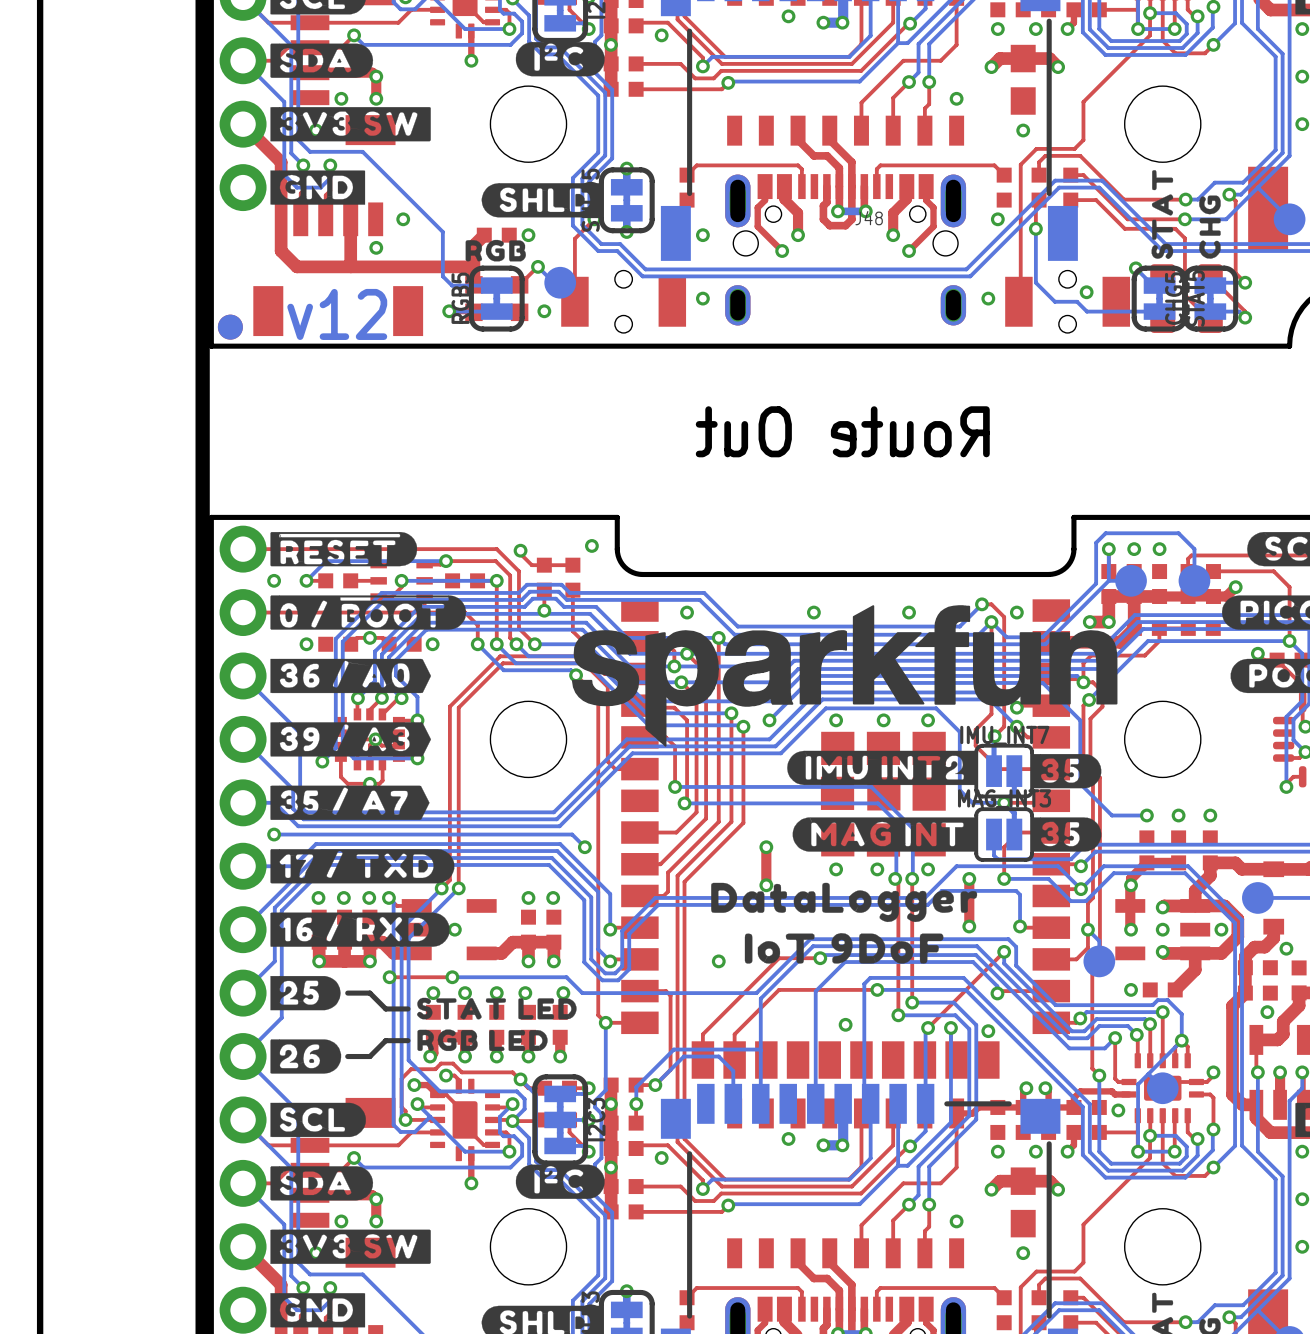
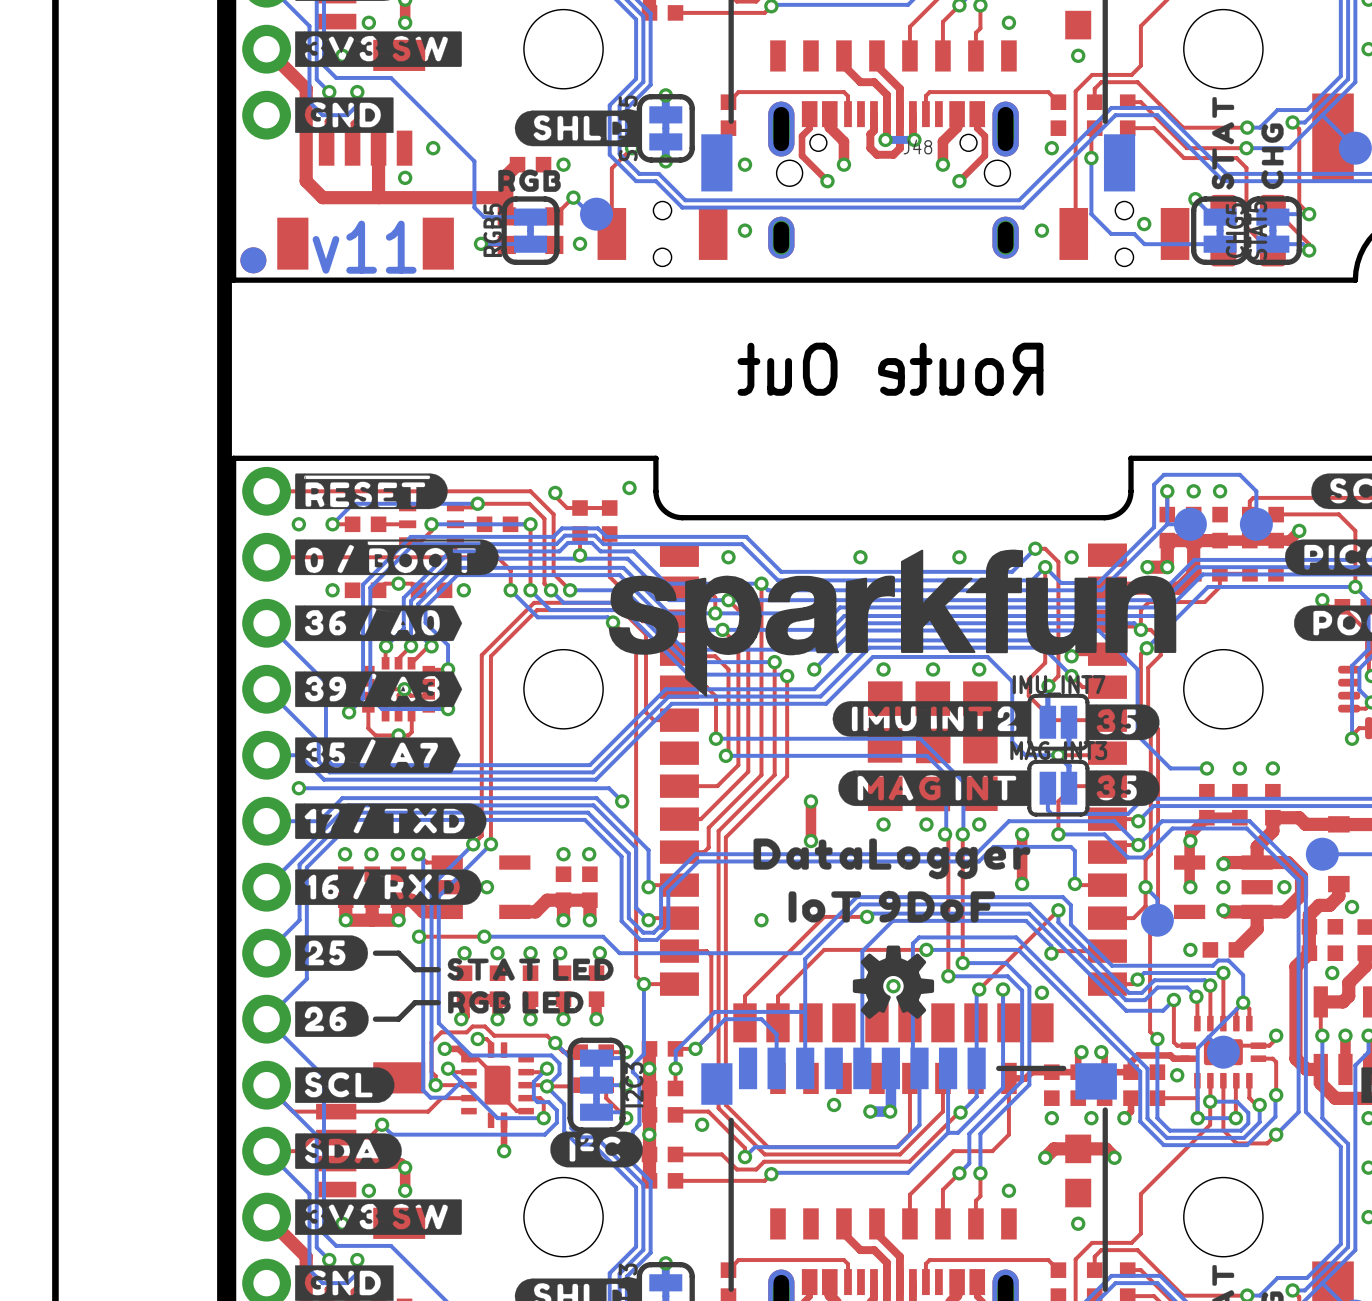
text: v12 (337, 314) -> v11 (364, 247)
drawing: none -> [852, 945, 935, 1019]

